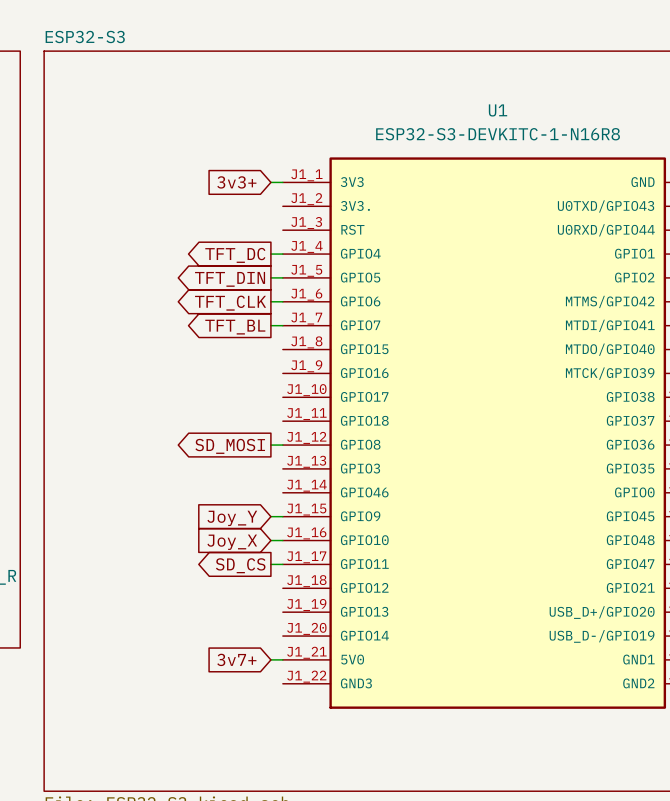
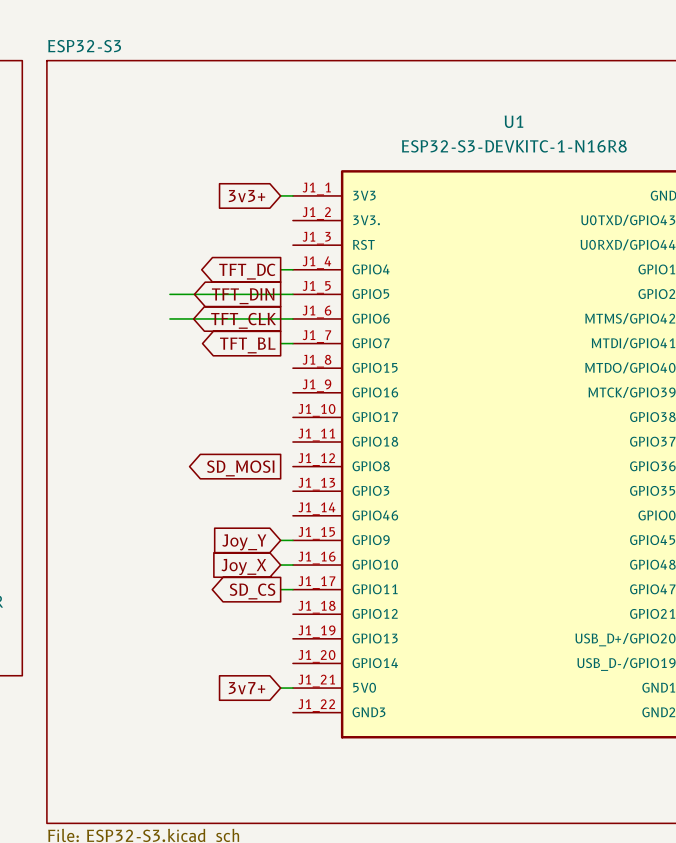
wire: none -> (169, 294) (280, 294)
wire: none -> (169, 318) (280, 318)
wire: (270, 445) (282, 445) -> none

